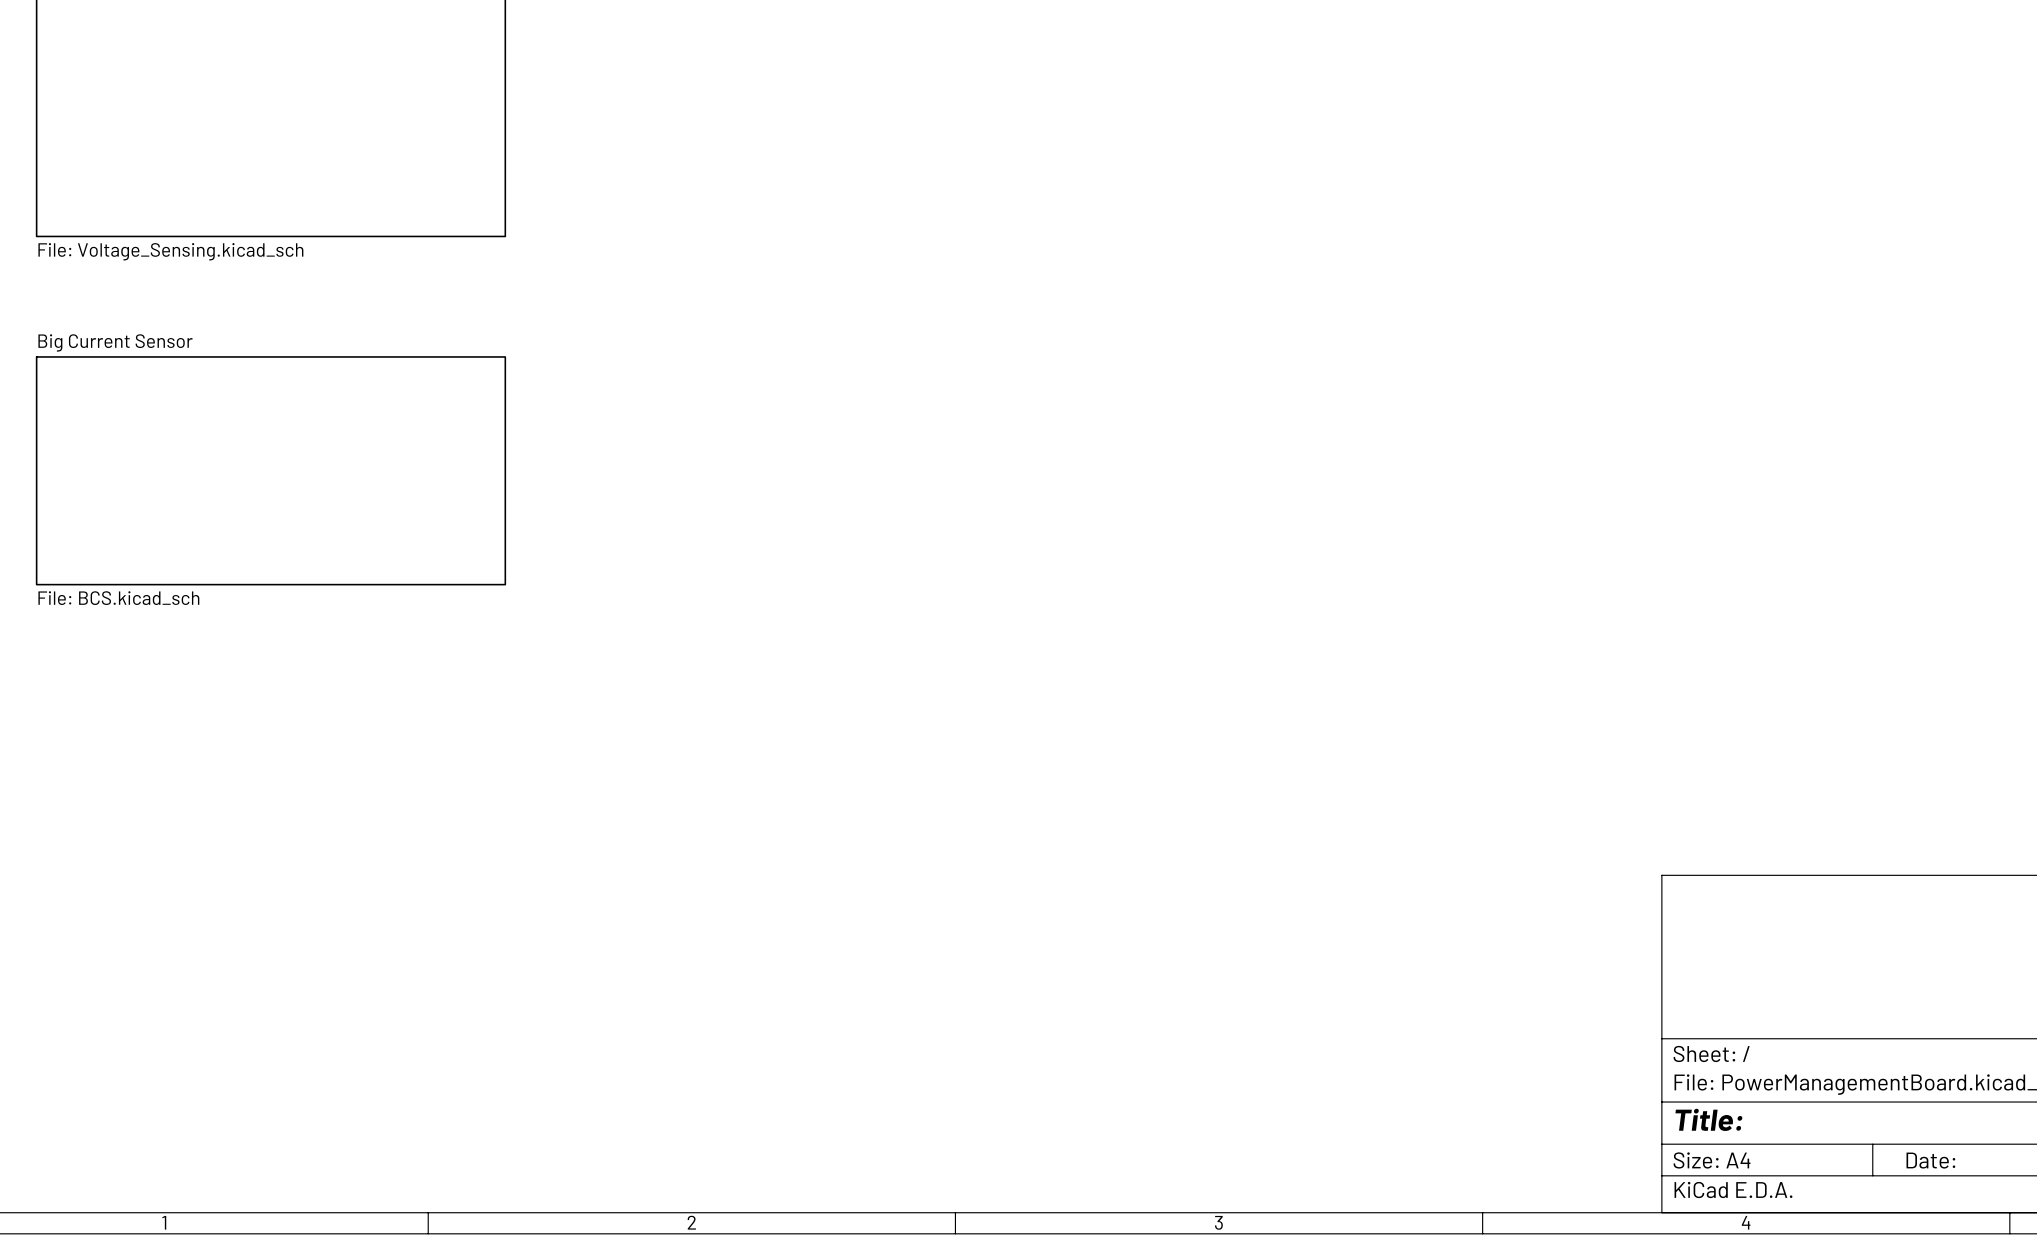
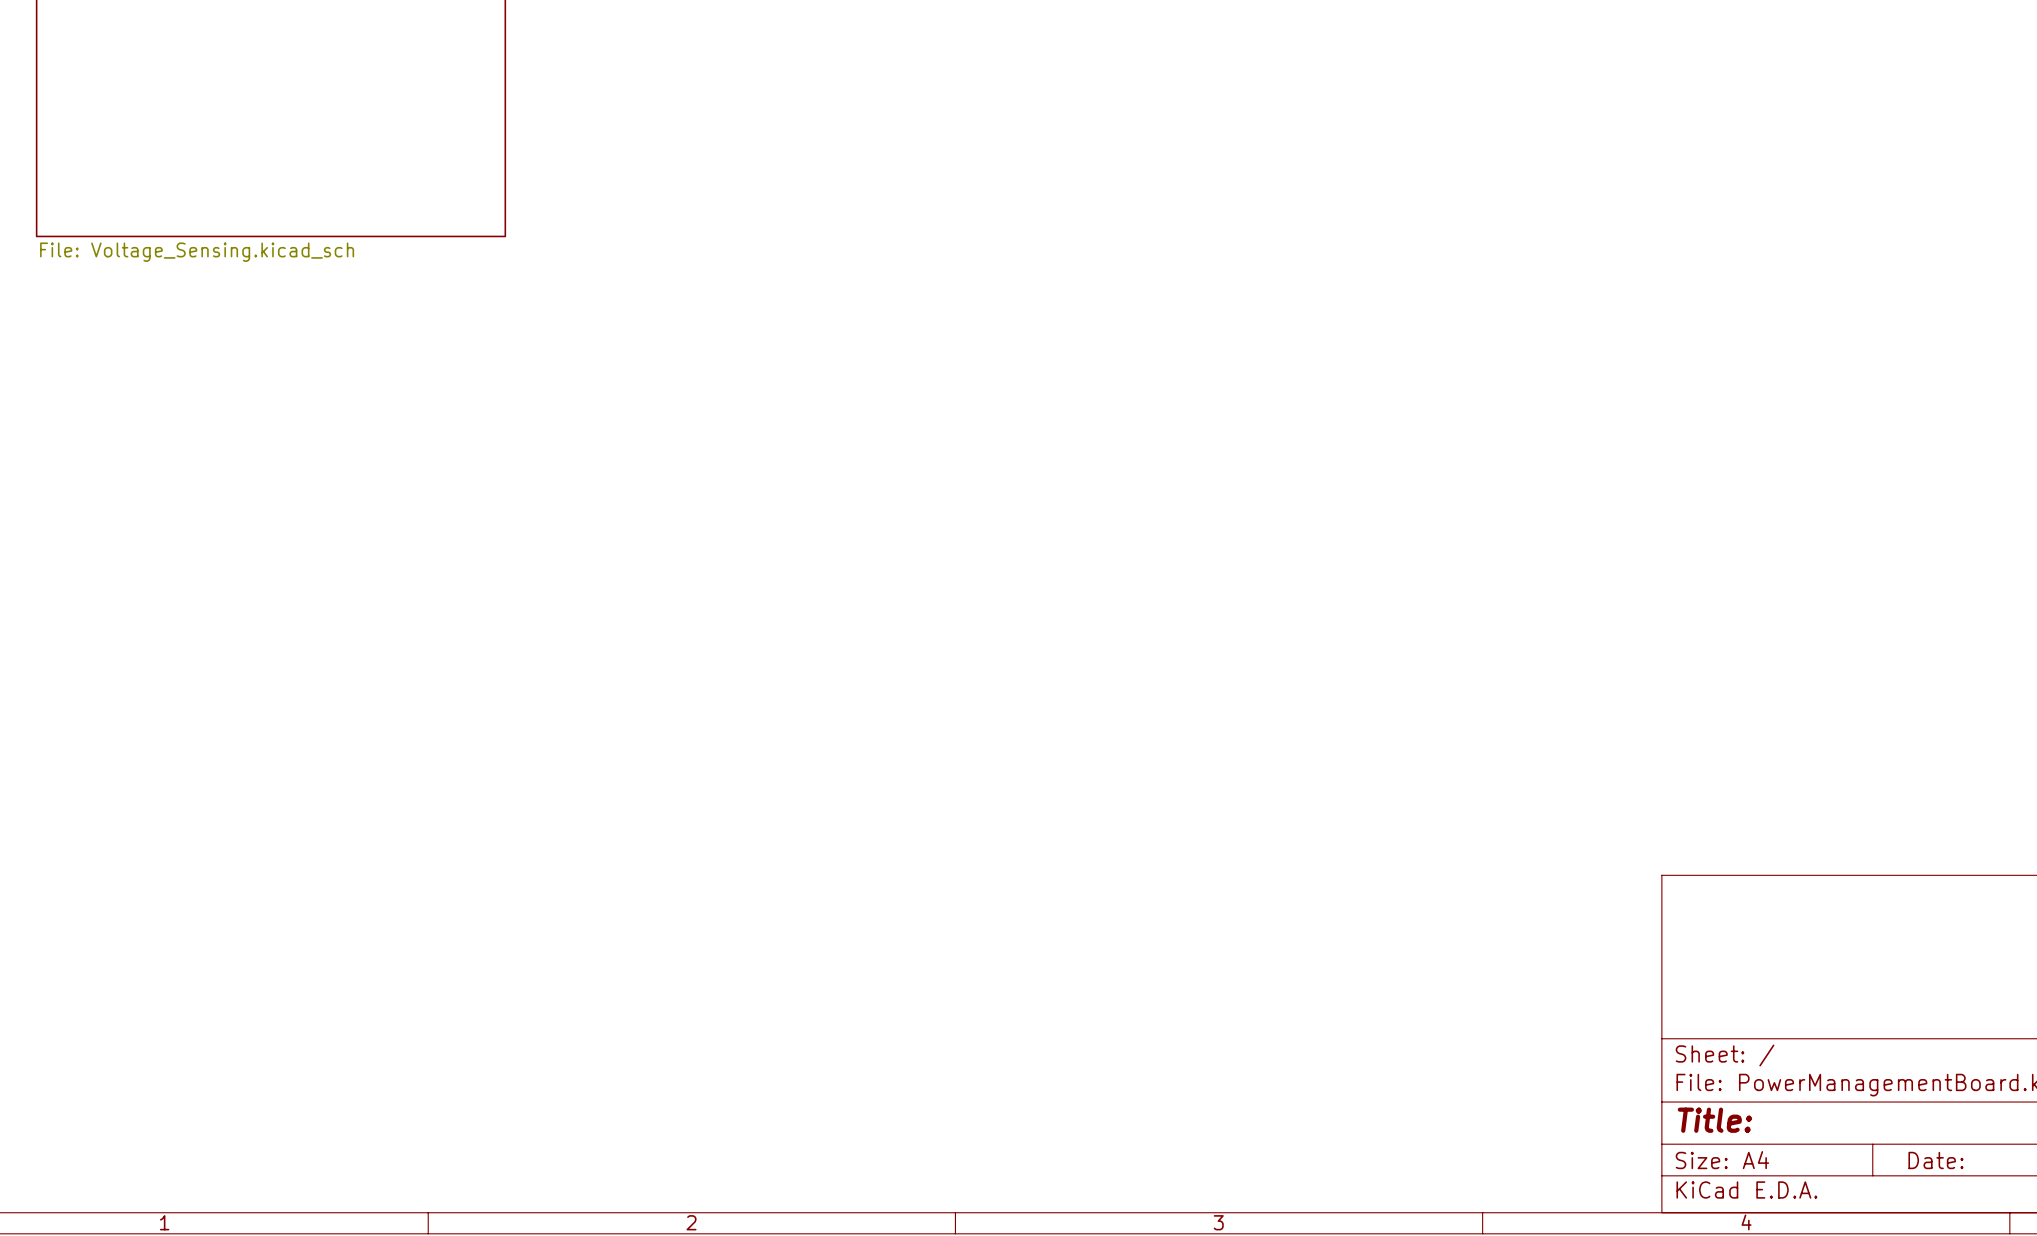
sheet Big Current Sensor: File: BCS.kicad_sch (270, 470) -> none

